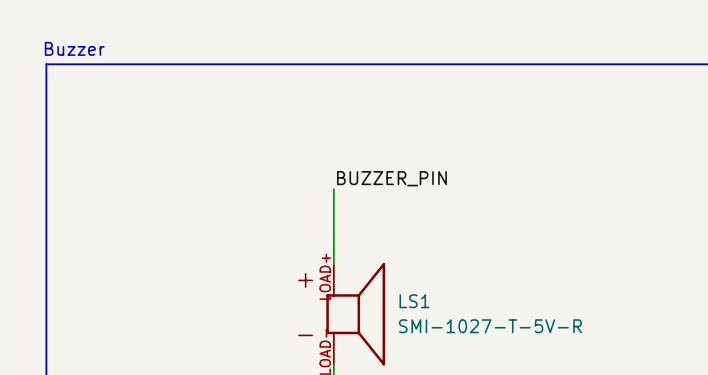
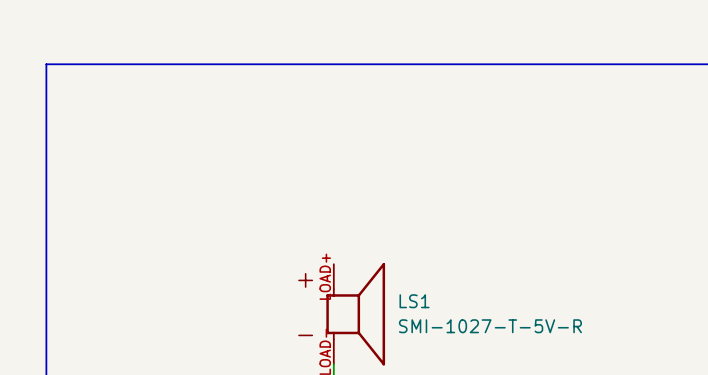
text: Buzzer (74, 48) -> none
label: BUZZER_PIN (391, 178) -> none
wire: (333, 189) (333, 264) -> none

